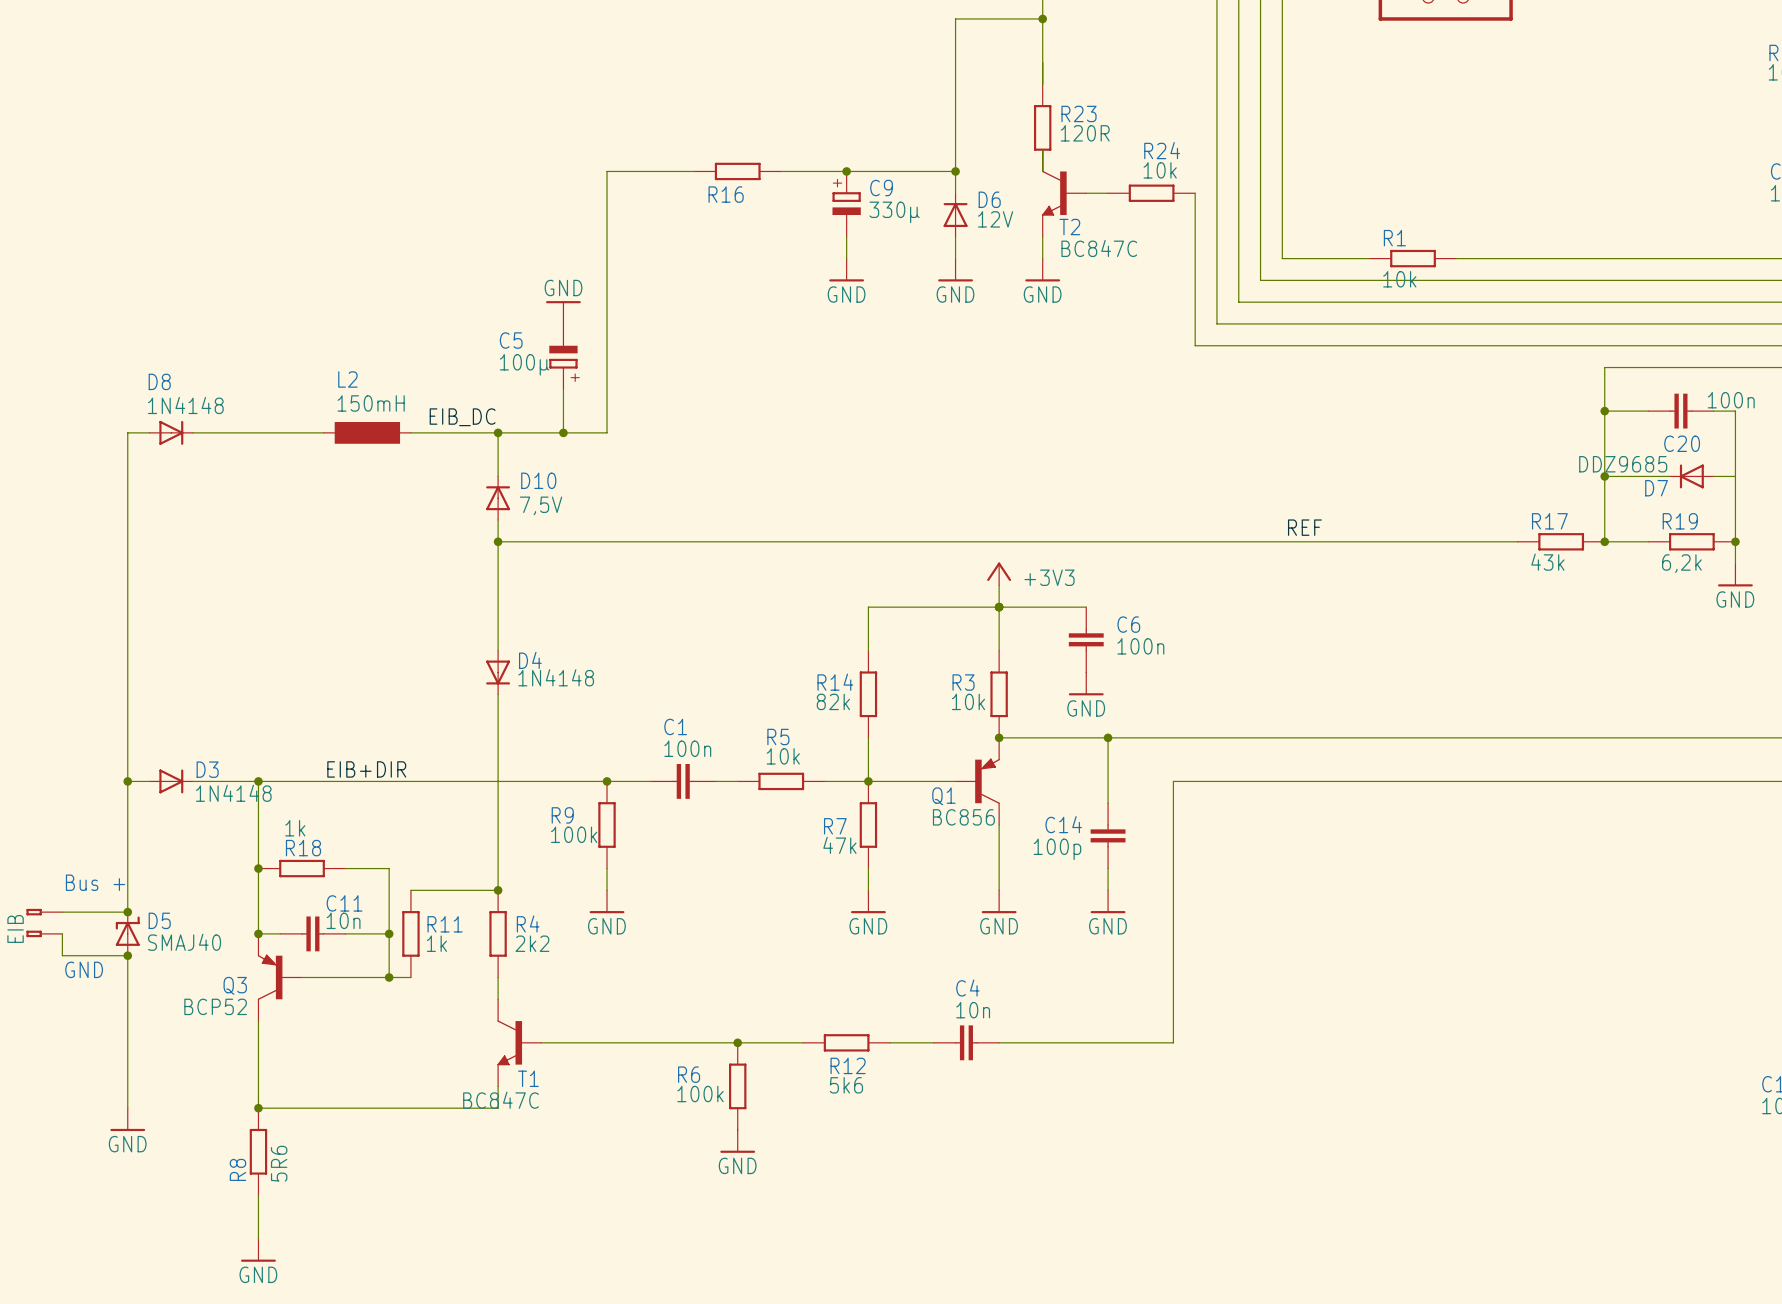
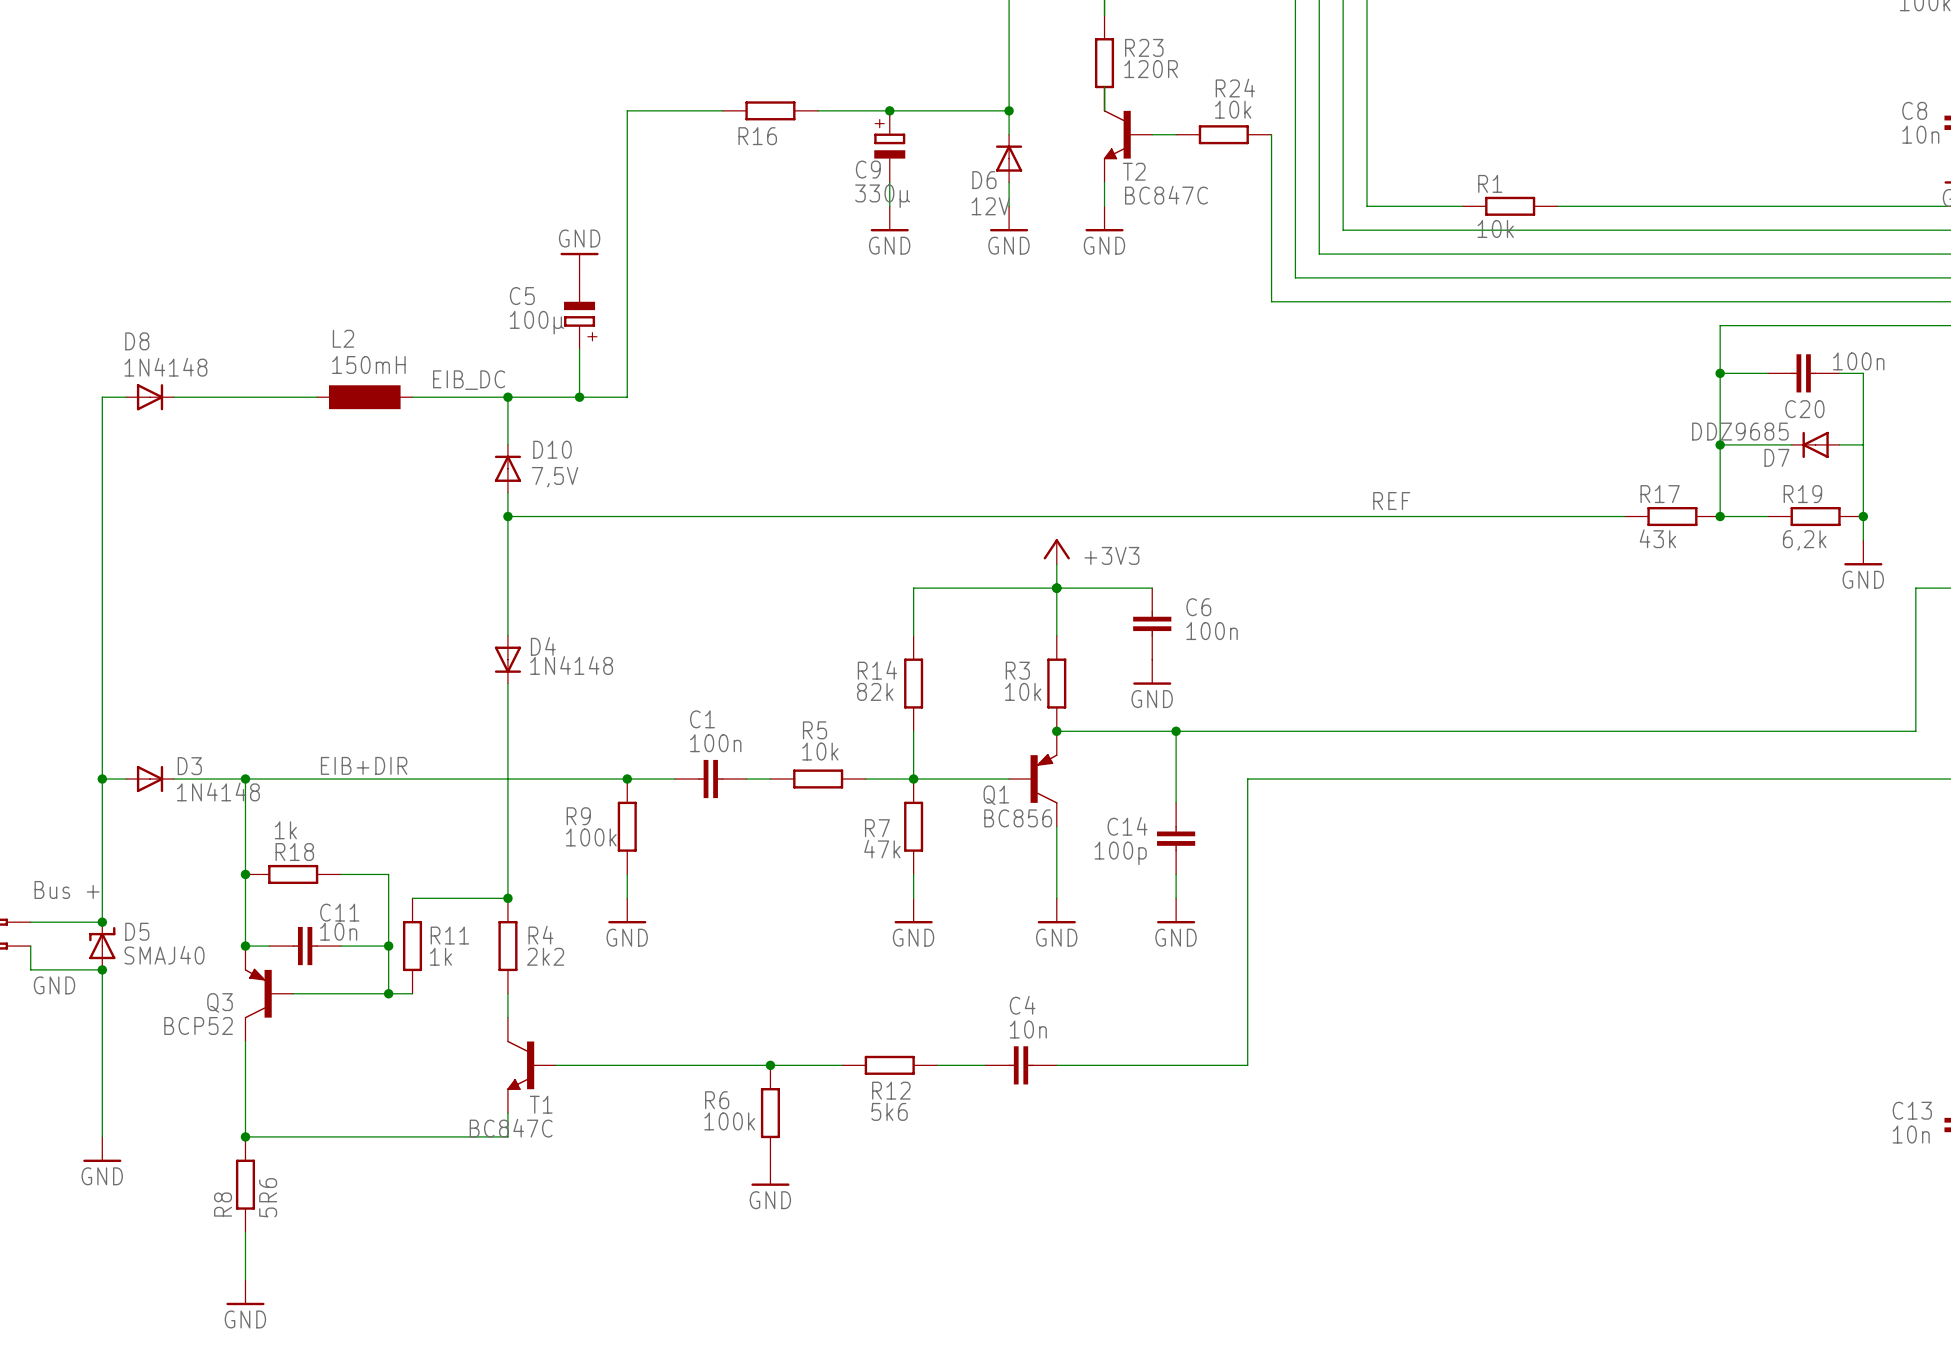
C9 name position: C9 (881, 188) -> C9 (868, 169)
D6 name position: D6 (989, 199) -> D6 (984, 180)
C9 value position: 330µ (894, 212) -> 330µ (882, 196)
D6 value position: 12V (995, 219) -> 12V (990, 206)

